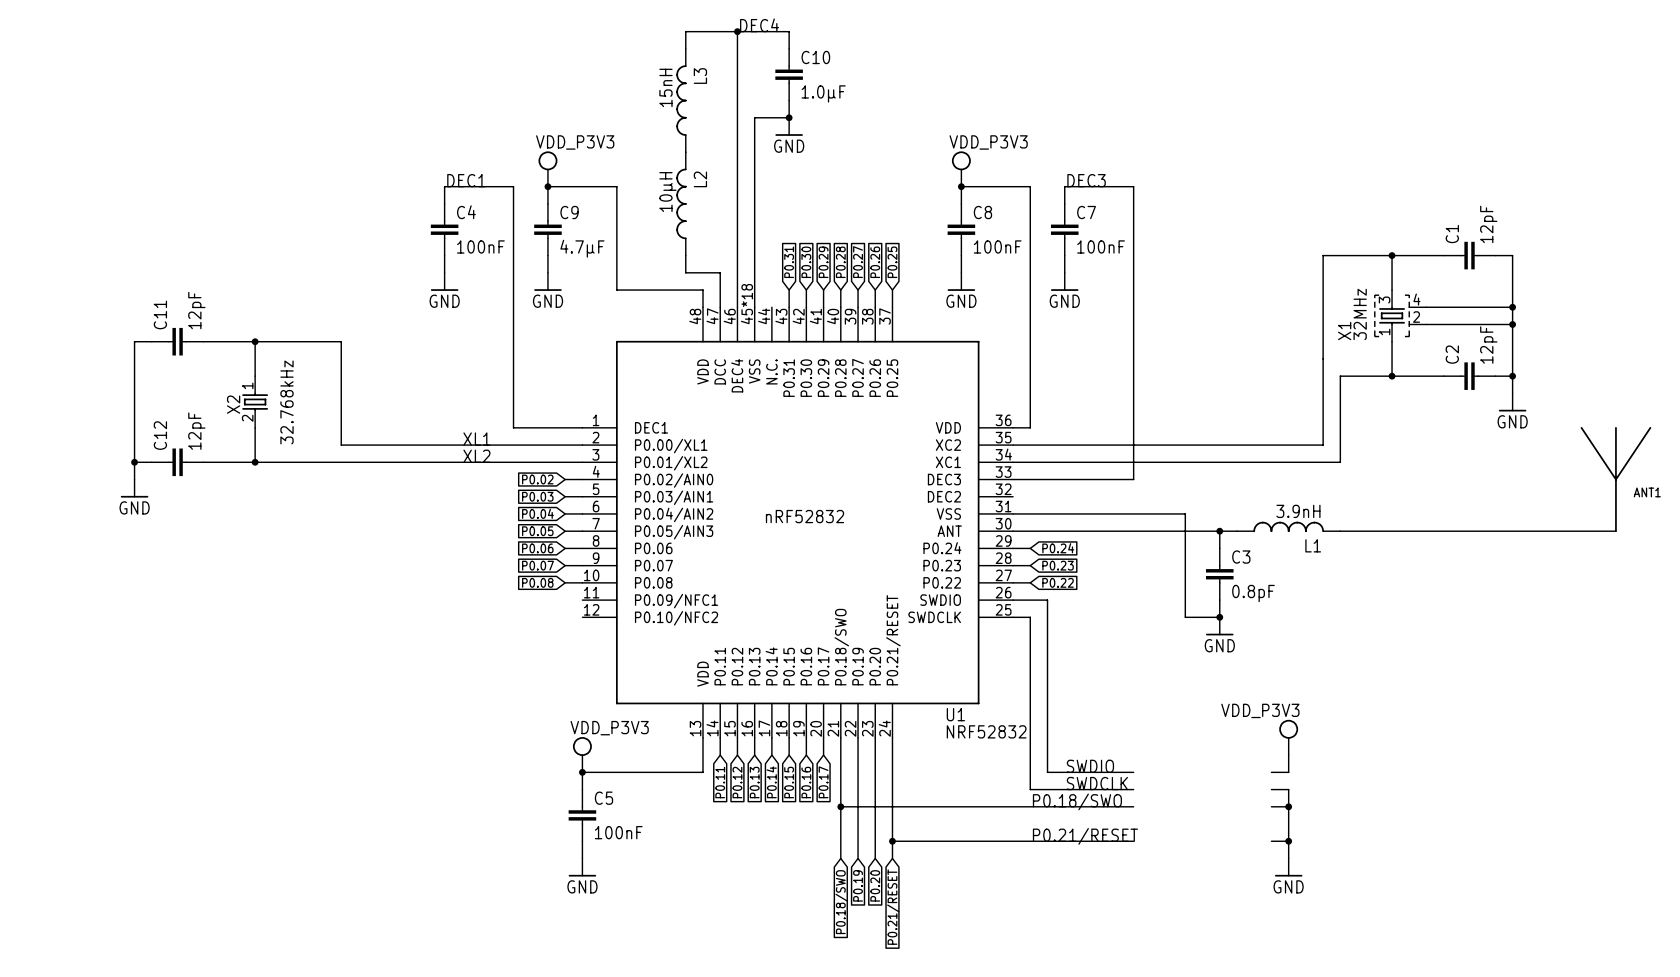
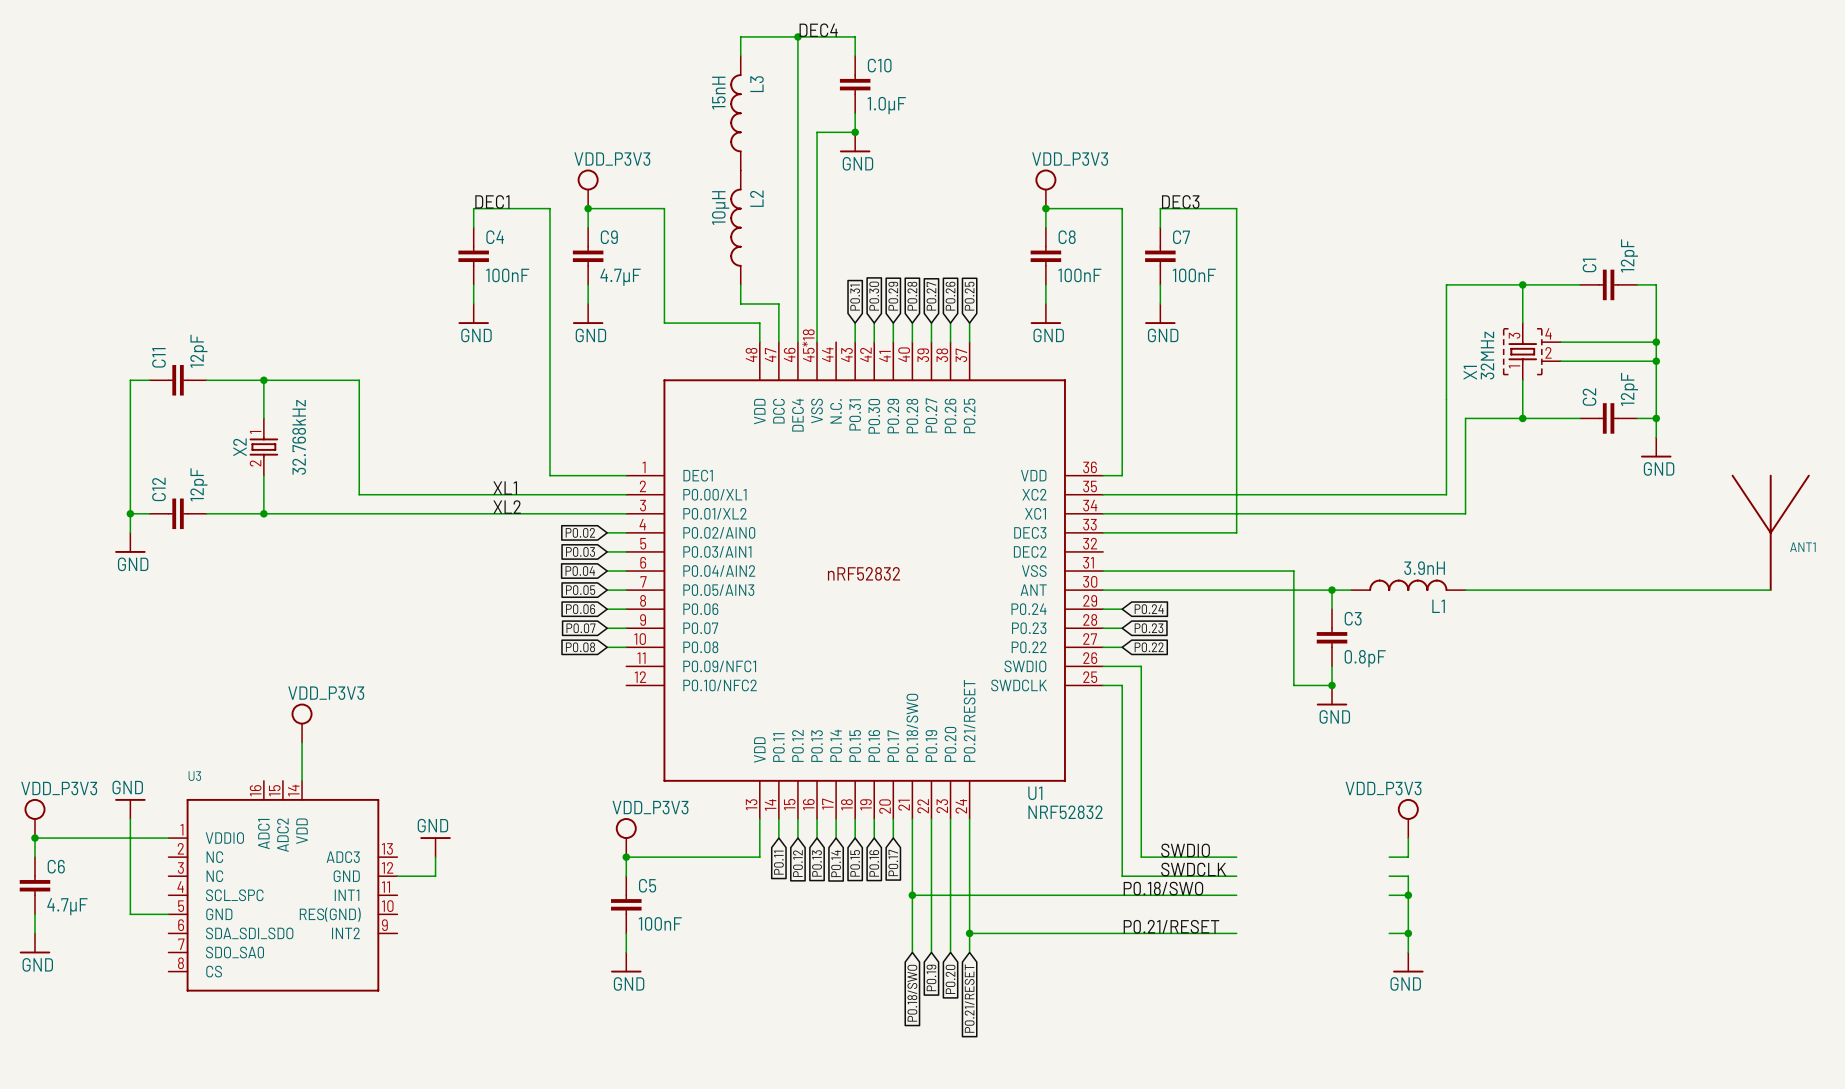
power symbol: none -> VDD_P3V3 (302, 723)
wire: none -> (302, 742) (302, 780)
power symbol: none -> GND (130, 808)
power symbol: none -> VDD_P3V3 (34, 818)
wire: none -> (130, 818) (130, 914) (168, 914)
junction: none -> (34, 838)
wire: none -> (168, 838) (34, 838) (34, 857)
power symbol: none -> GND (435, 847)
wire: none -> (435, 857) (435, 876) (397, 876)
C6: none -> 4.7µF (34, 885)
U3: none -> (282, 886)
wire: none -> (34, 914) (34, 933)
power symbol: none -> GND (34, 943)

